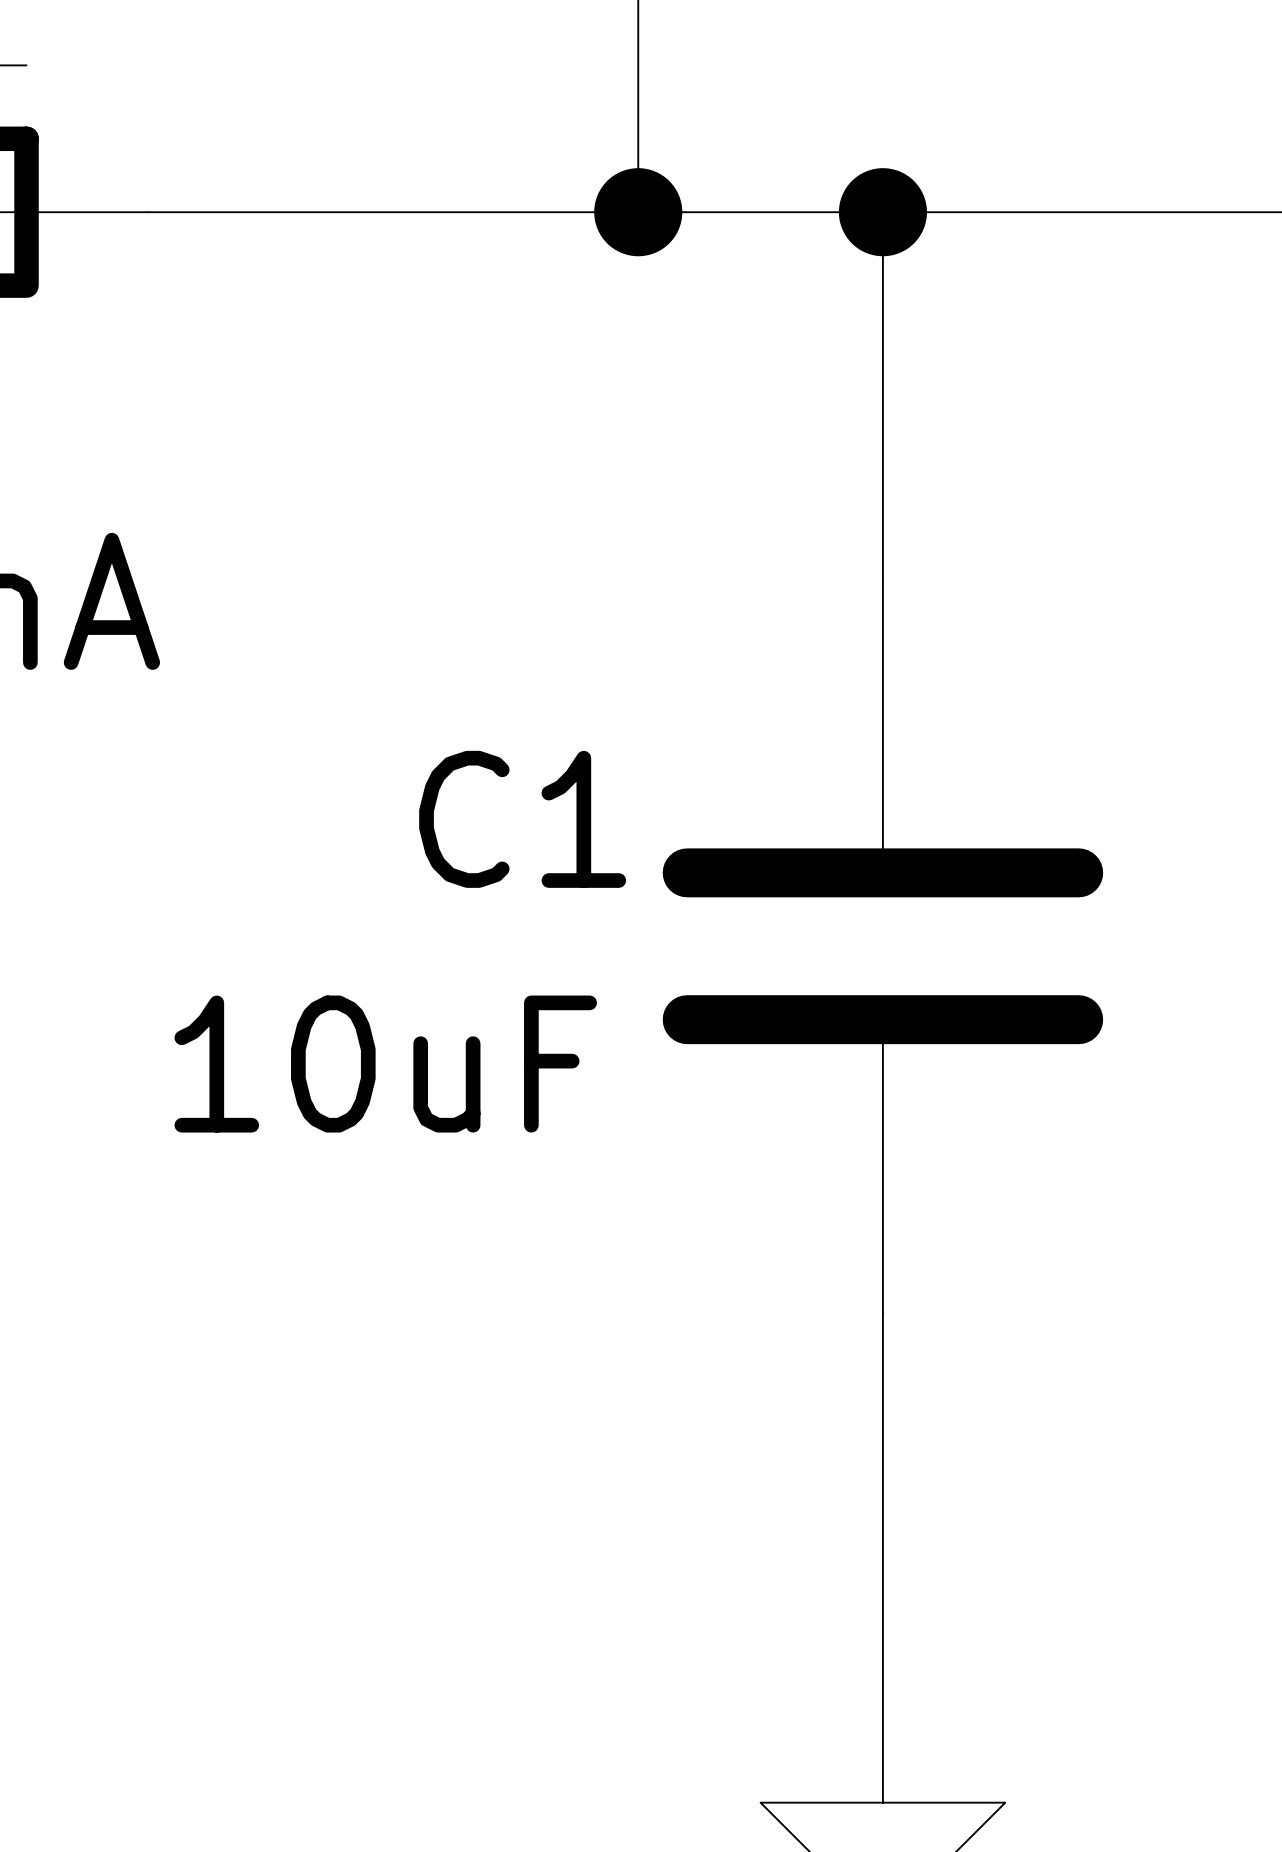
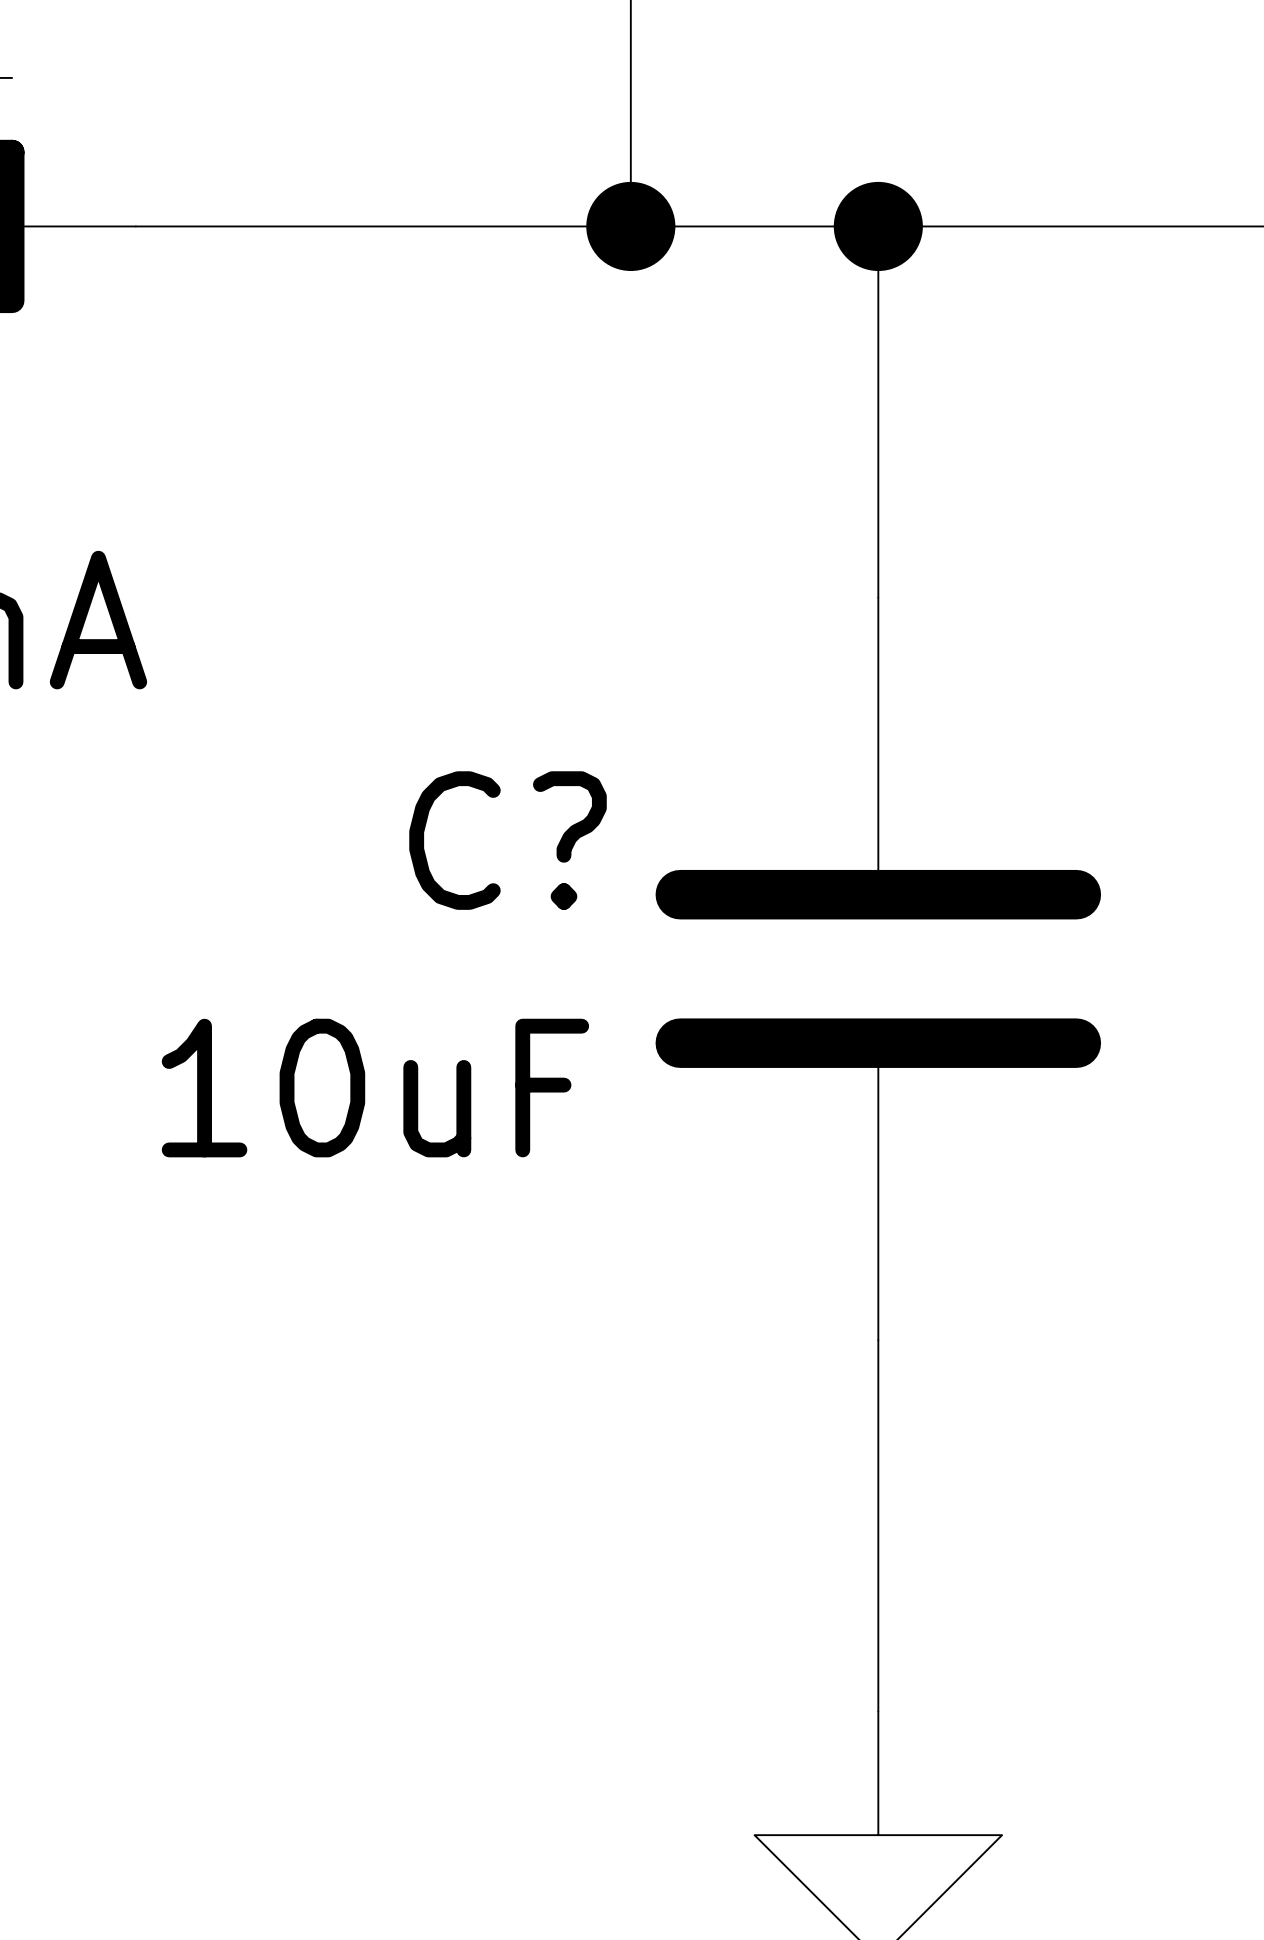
C1 name: C1 (522, 819) -> C? (508, 840)

